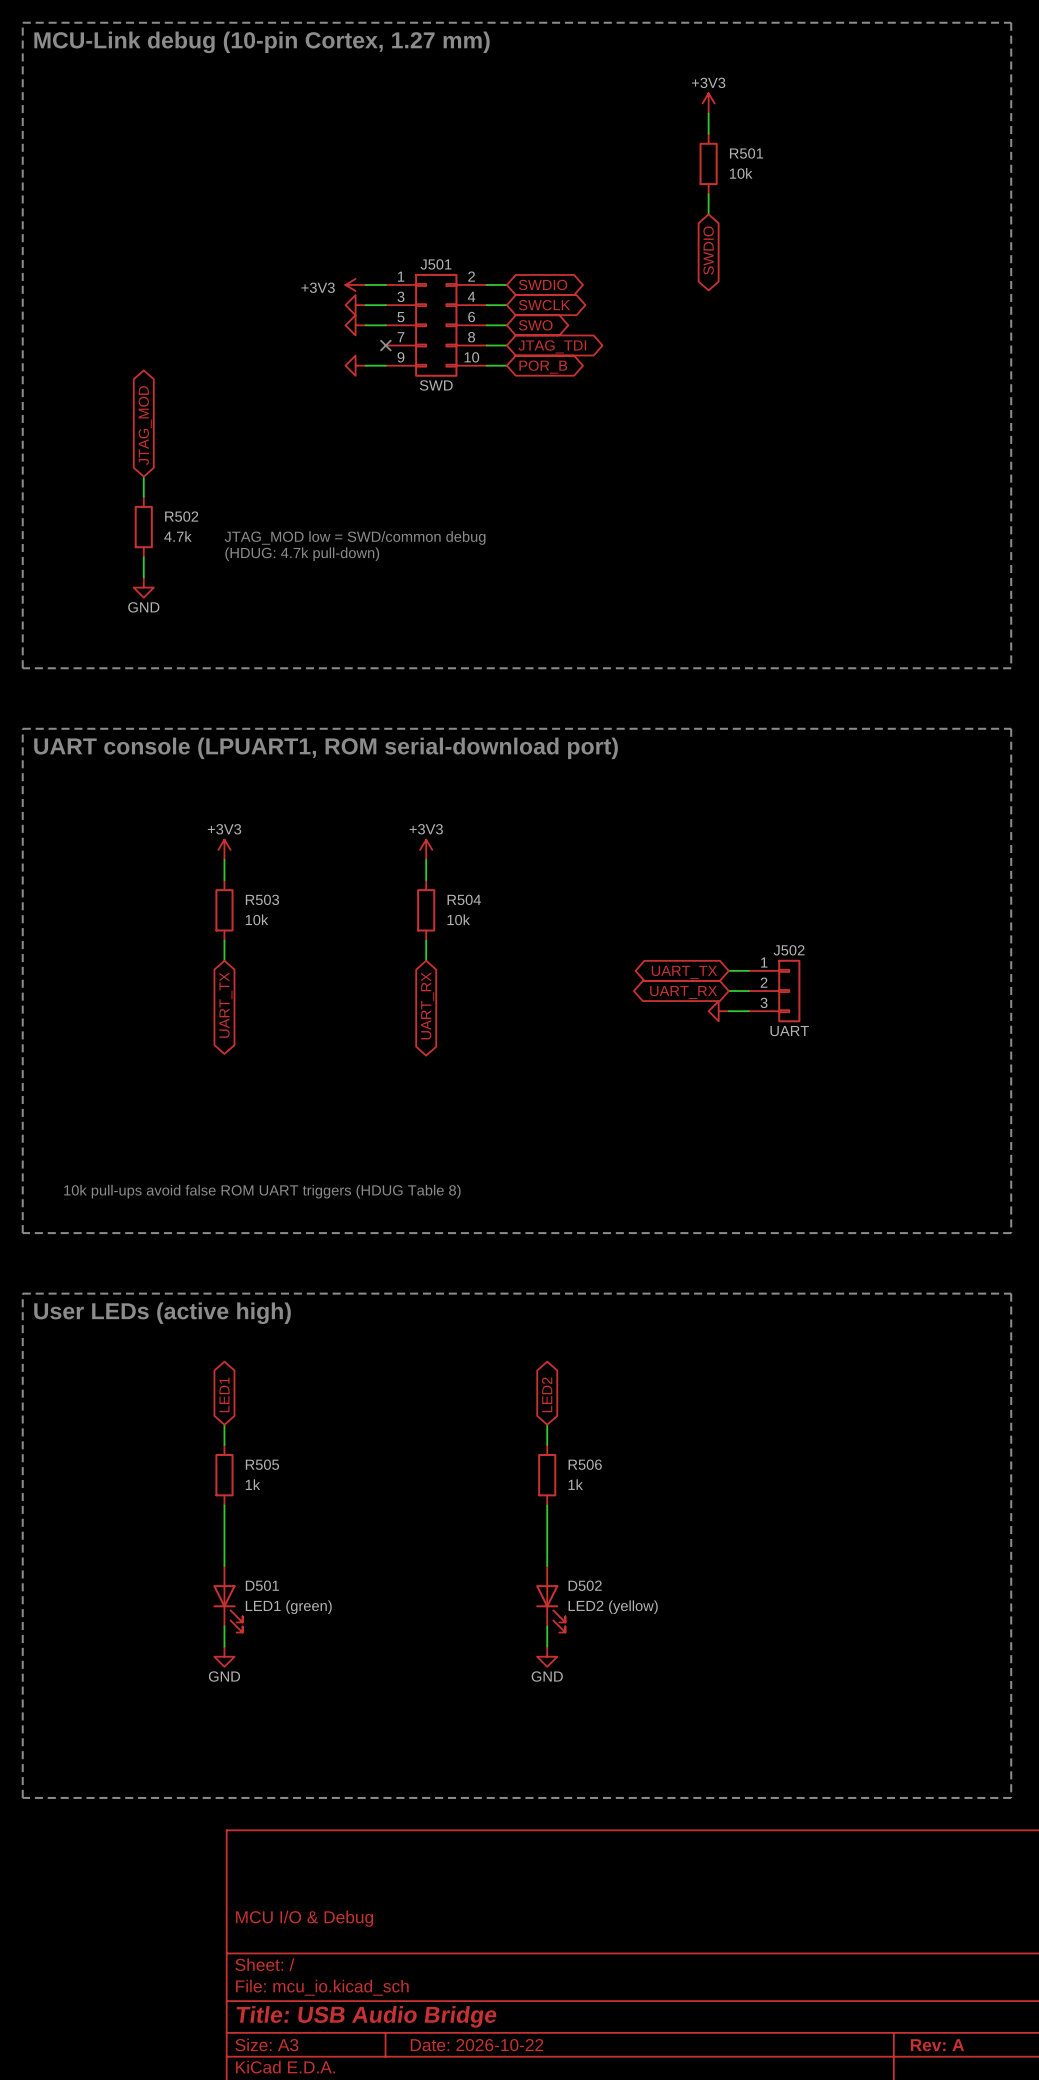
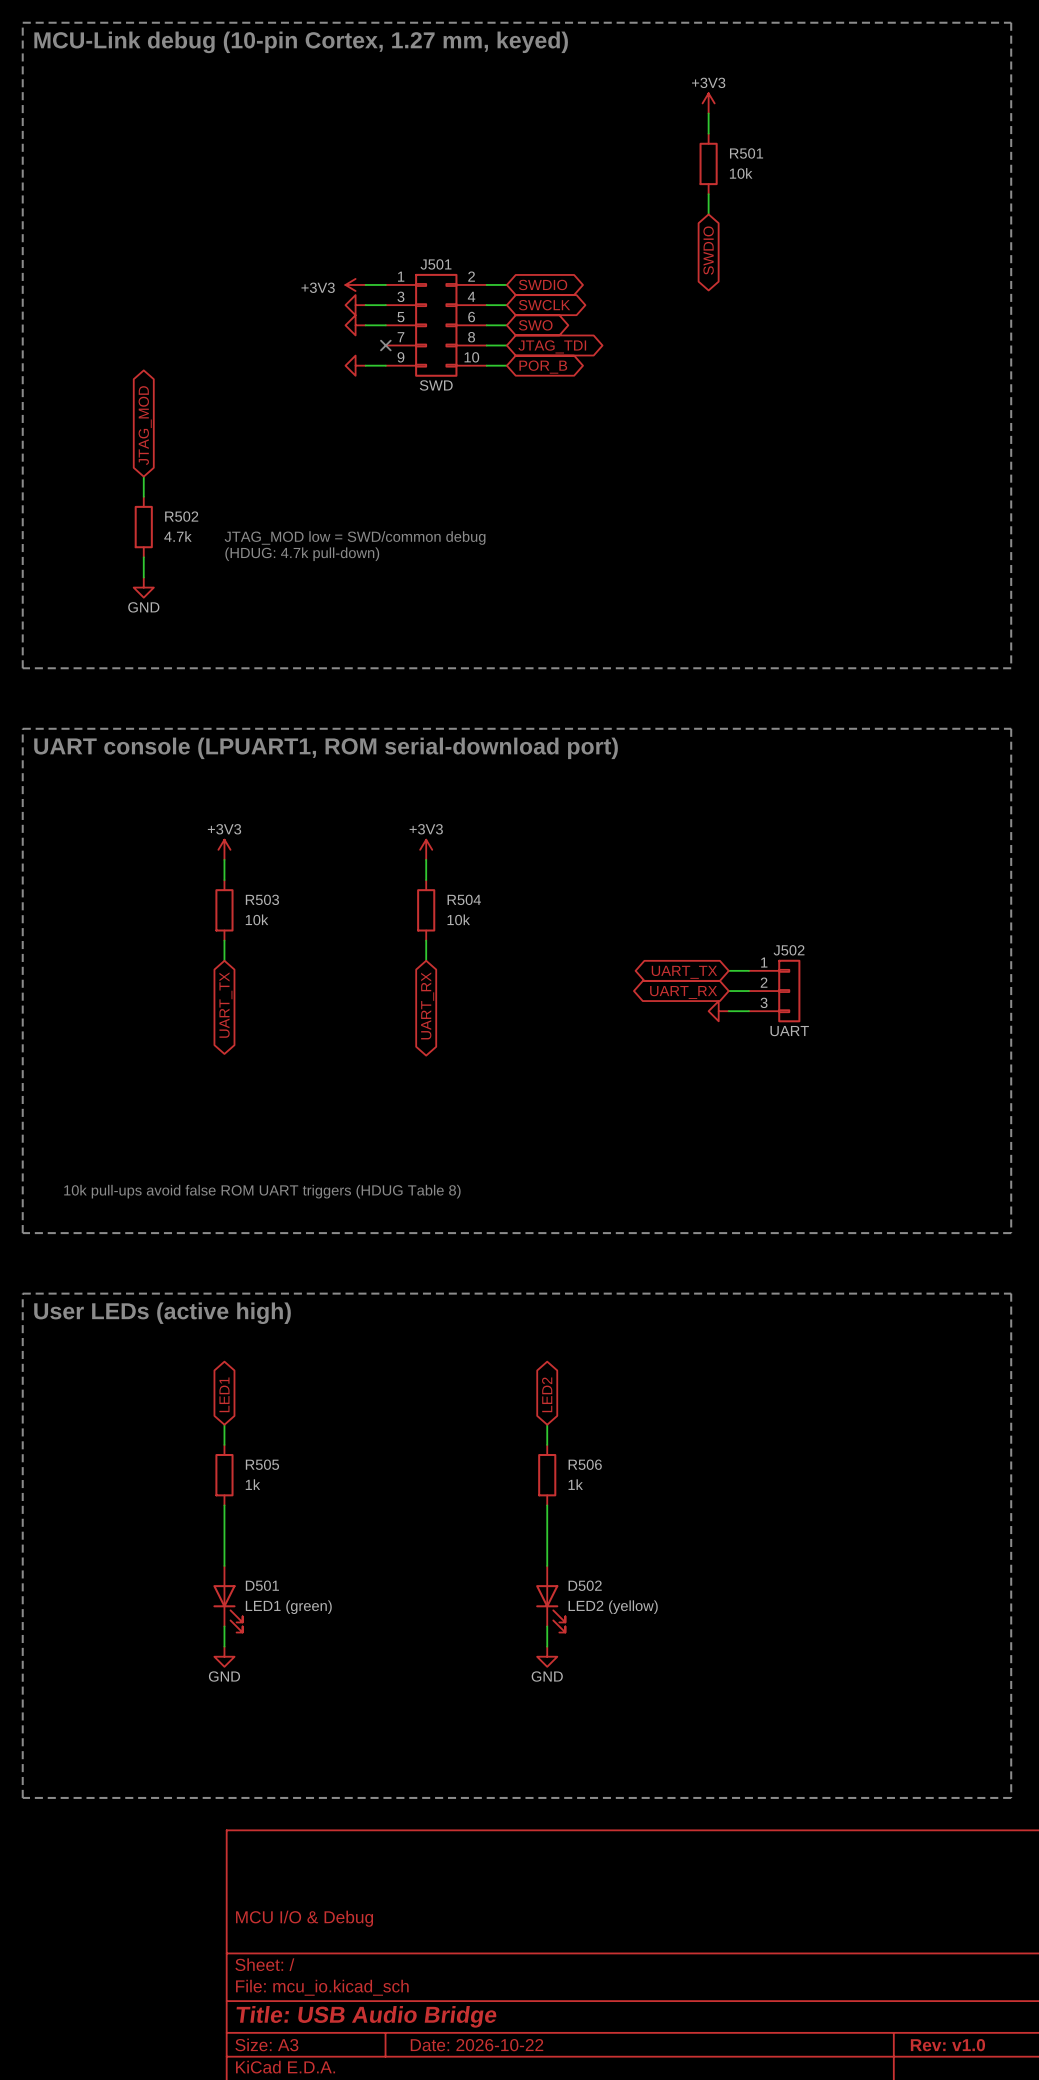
text: MCU-Link debug (10-pin Cortex, 1.27 mm) (262, 42) -> MCU-Link debug (10-pin Cortex, 1.27 mm, keyed) (301, 42)
title block: Rev: A (937, 2045) -> Rev: v1.0 (947, 2045)

